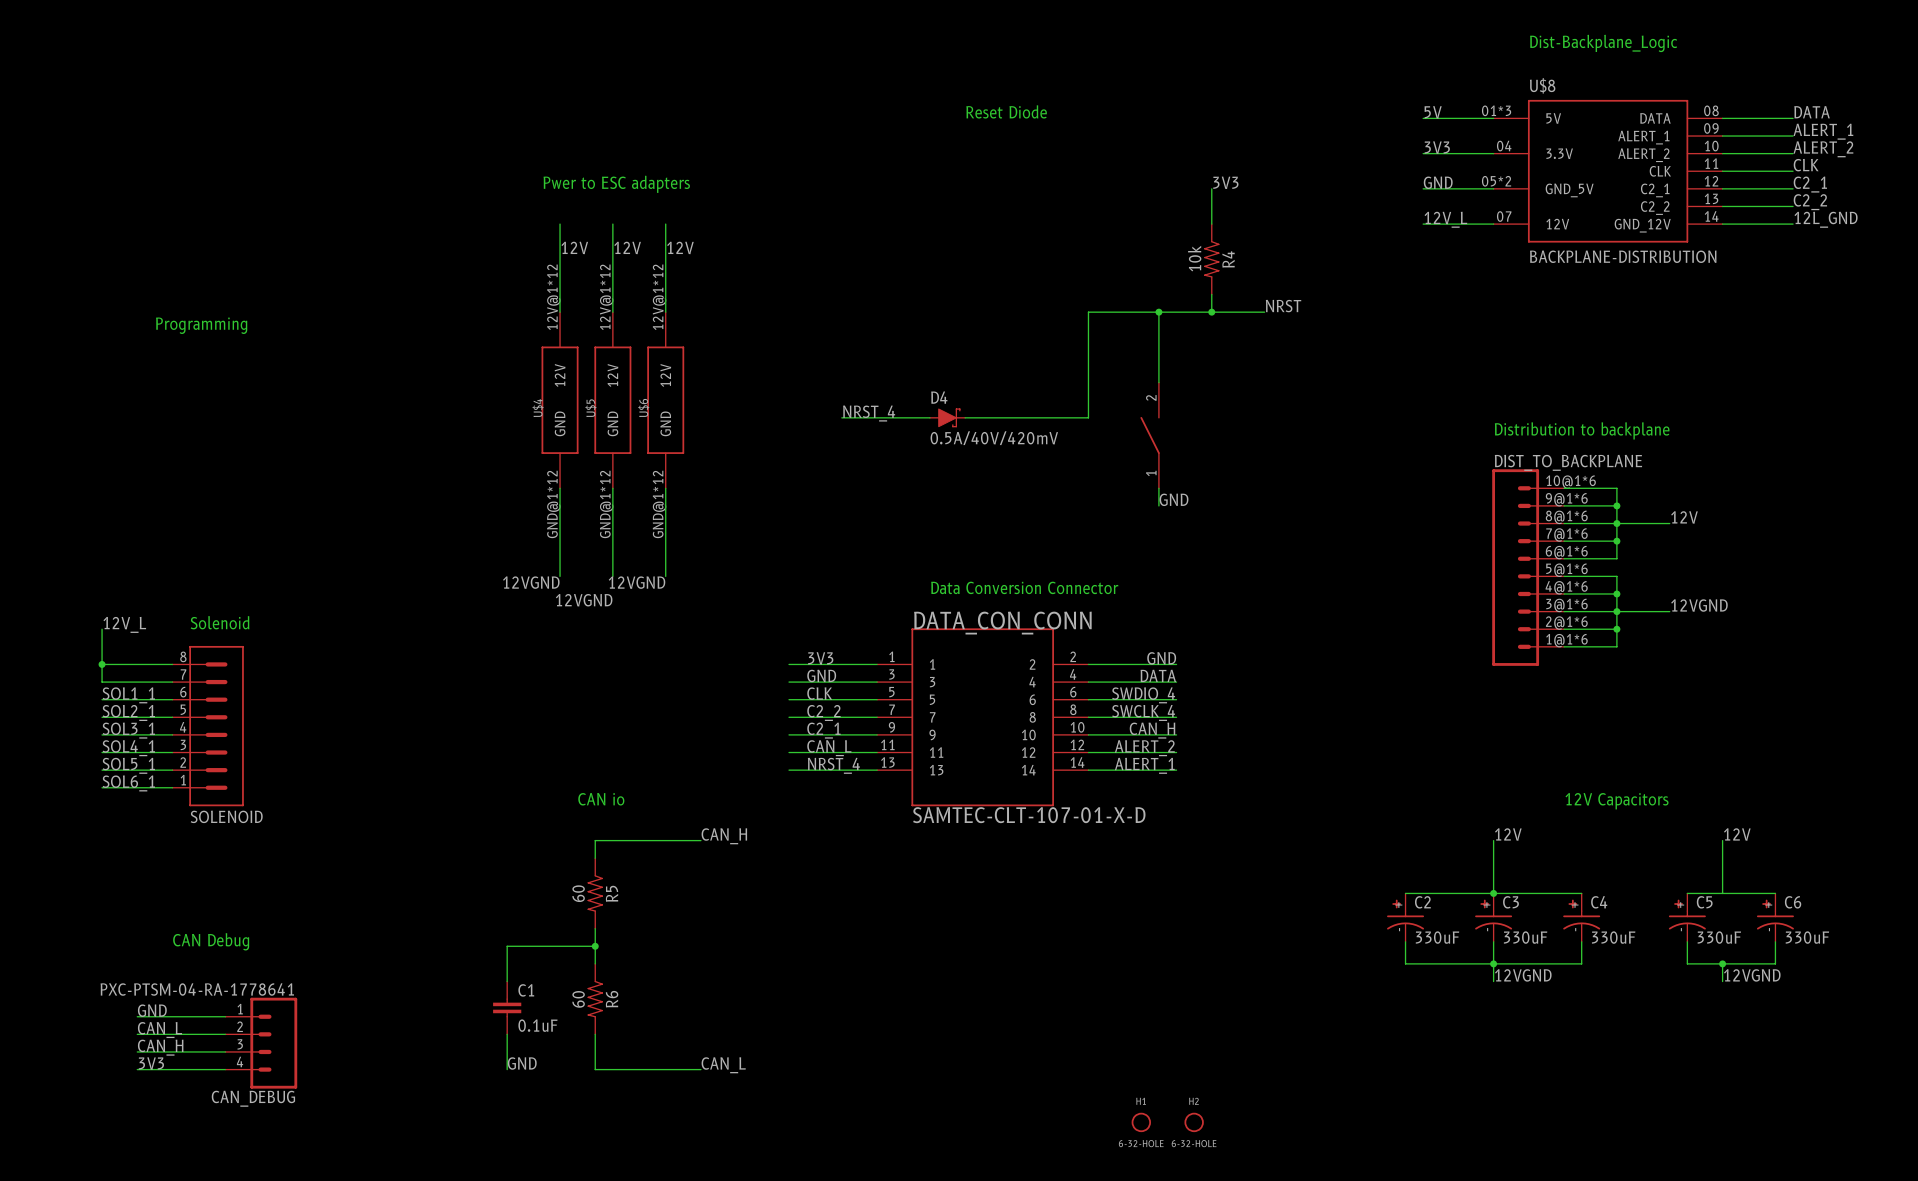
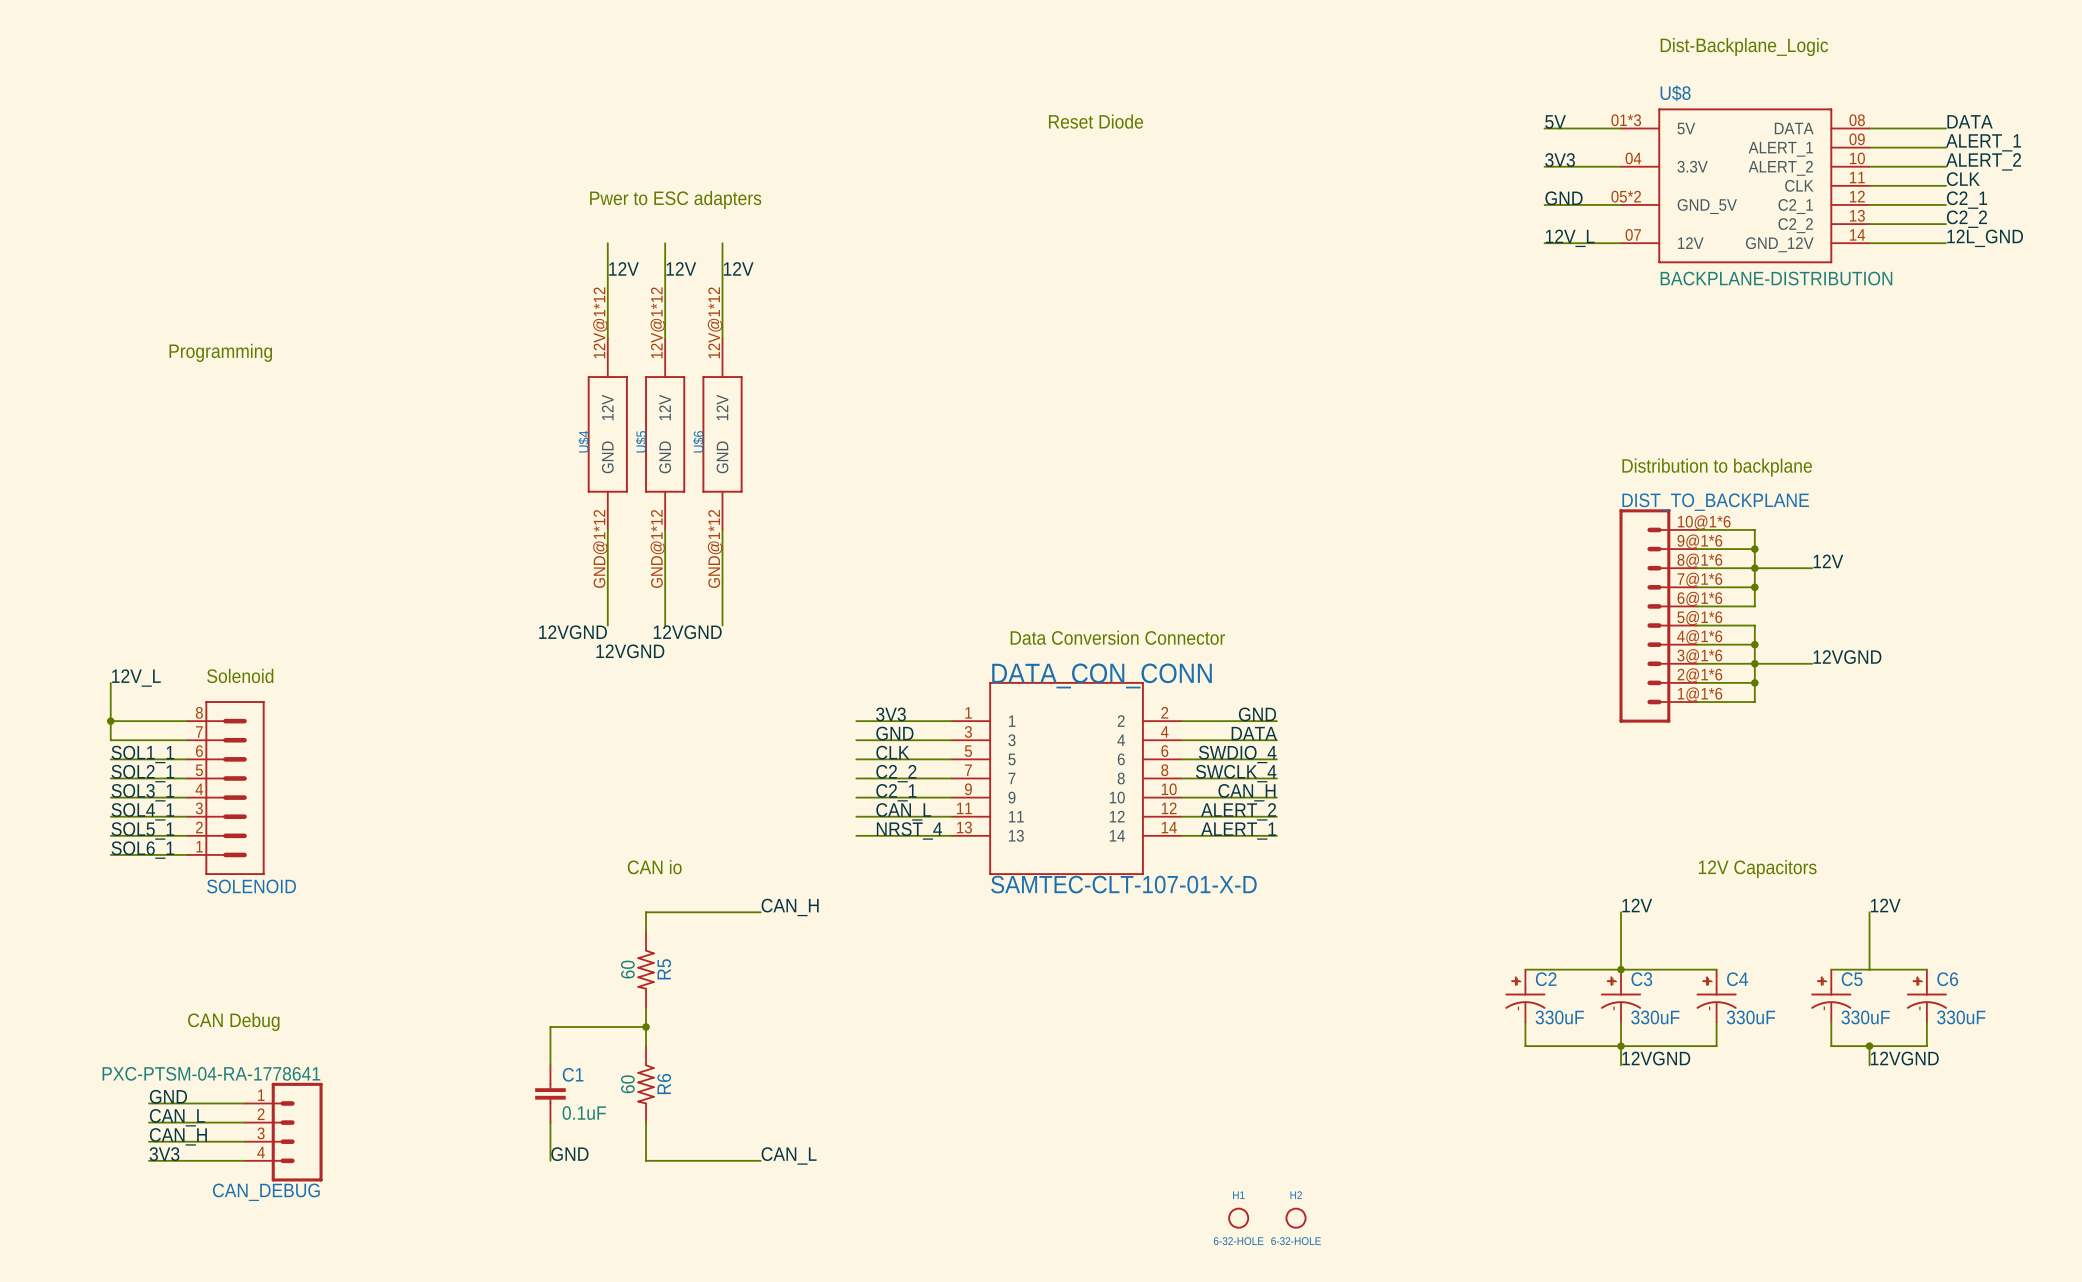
label: 3V3 (1225, 182) -> none
wire: (1211, 188) (1211, 224) -> none
R4: 10k (1211, 259) -> none
wire: (1211, 294) (1211, 312) -> none
label: NRST (1283, 306) -> none
wire: (1158, 312) (1158, 382) -> none
junction: (1158, 312) -> none
junction: (1211, 312) -> none
wire: (1264, 312) (1088, 312) (1088, 417) (965, 417) -> none
label: NRST_4 (869, 413) -> none
wire: (841, 417) (929, 417) -> none
D4: 0.5A/40V/420mV (947, 417) -> none
part: (1150, 435) -> none
wire: (1158, 488) (1158, 505) -> none
label: GND (1173, 499) -> none

